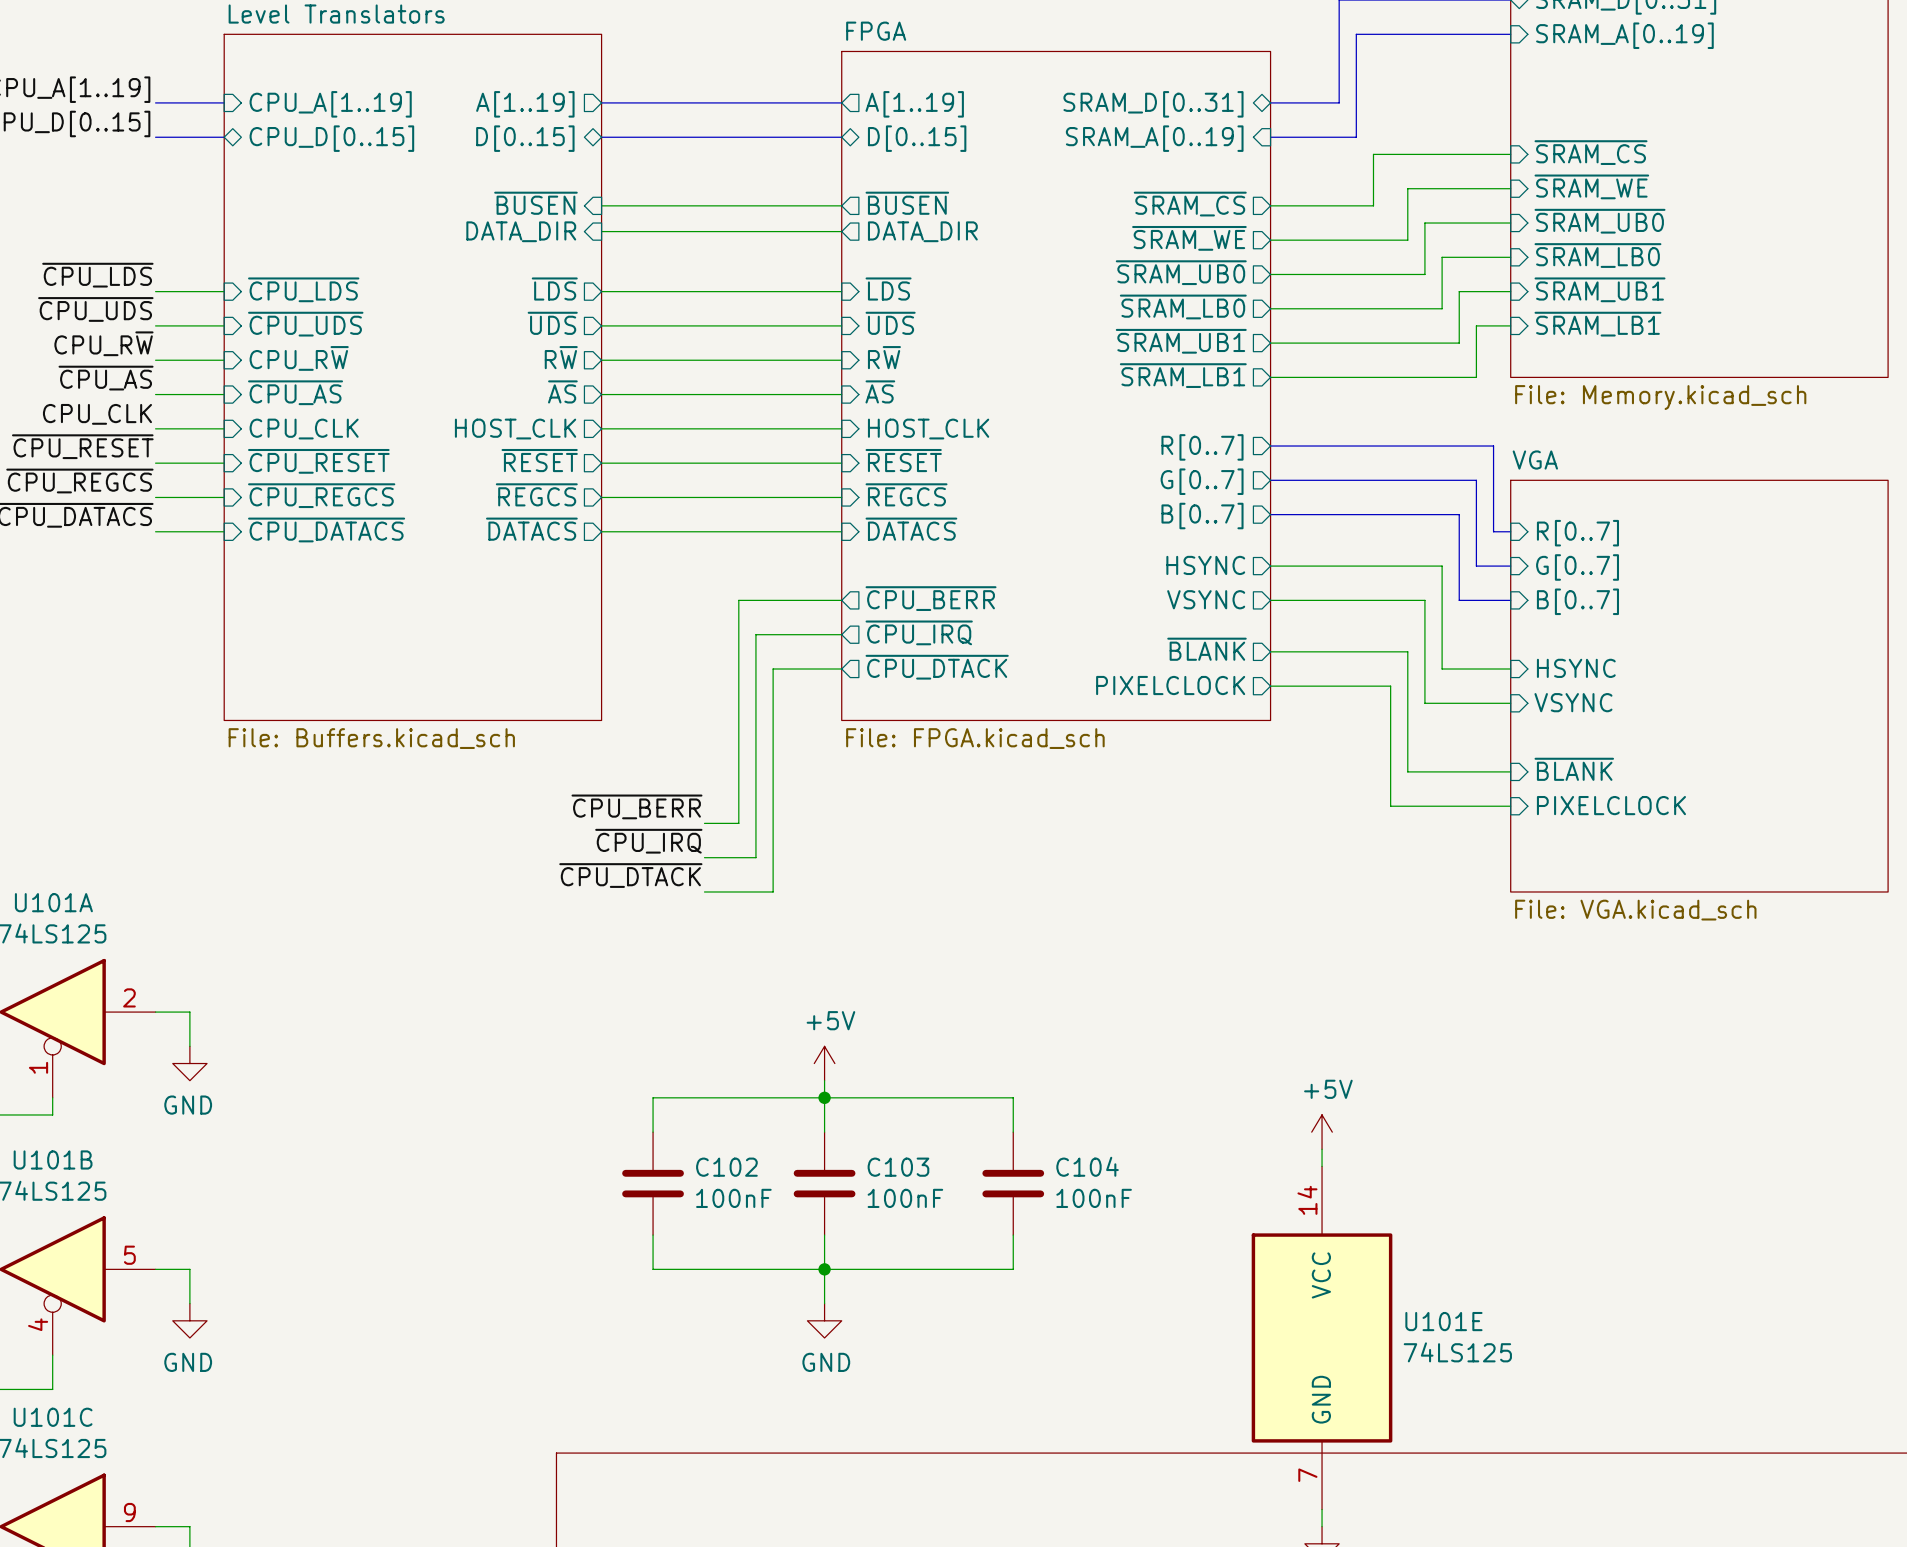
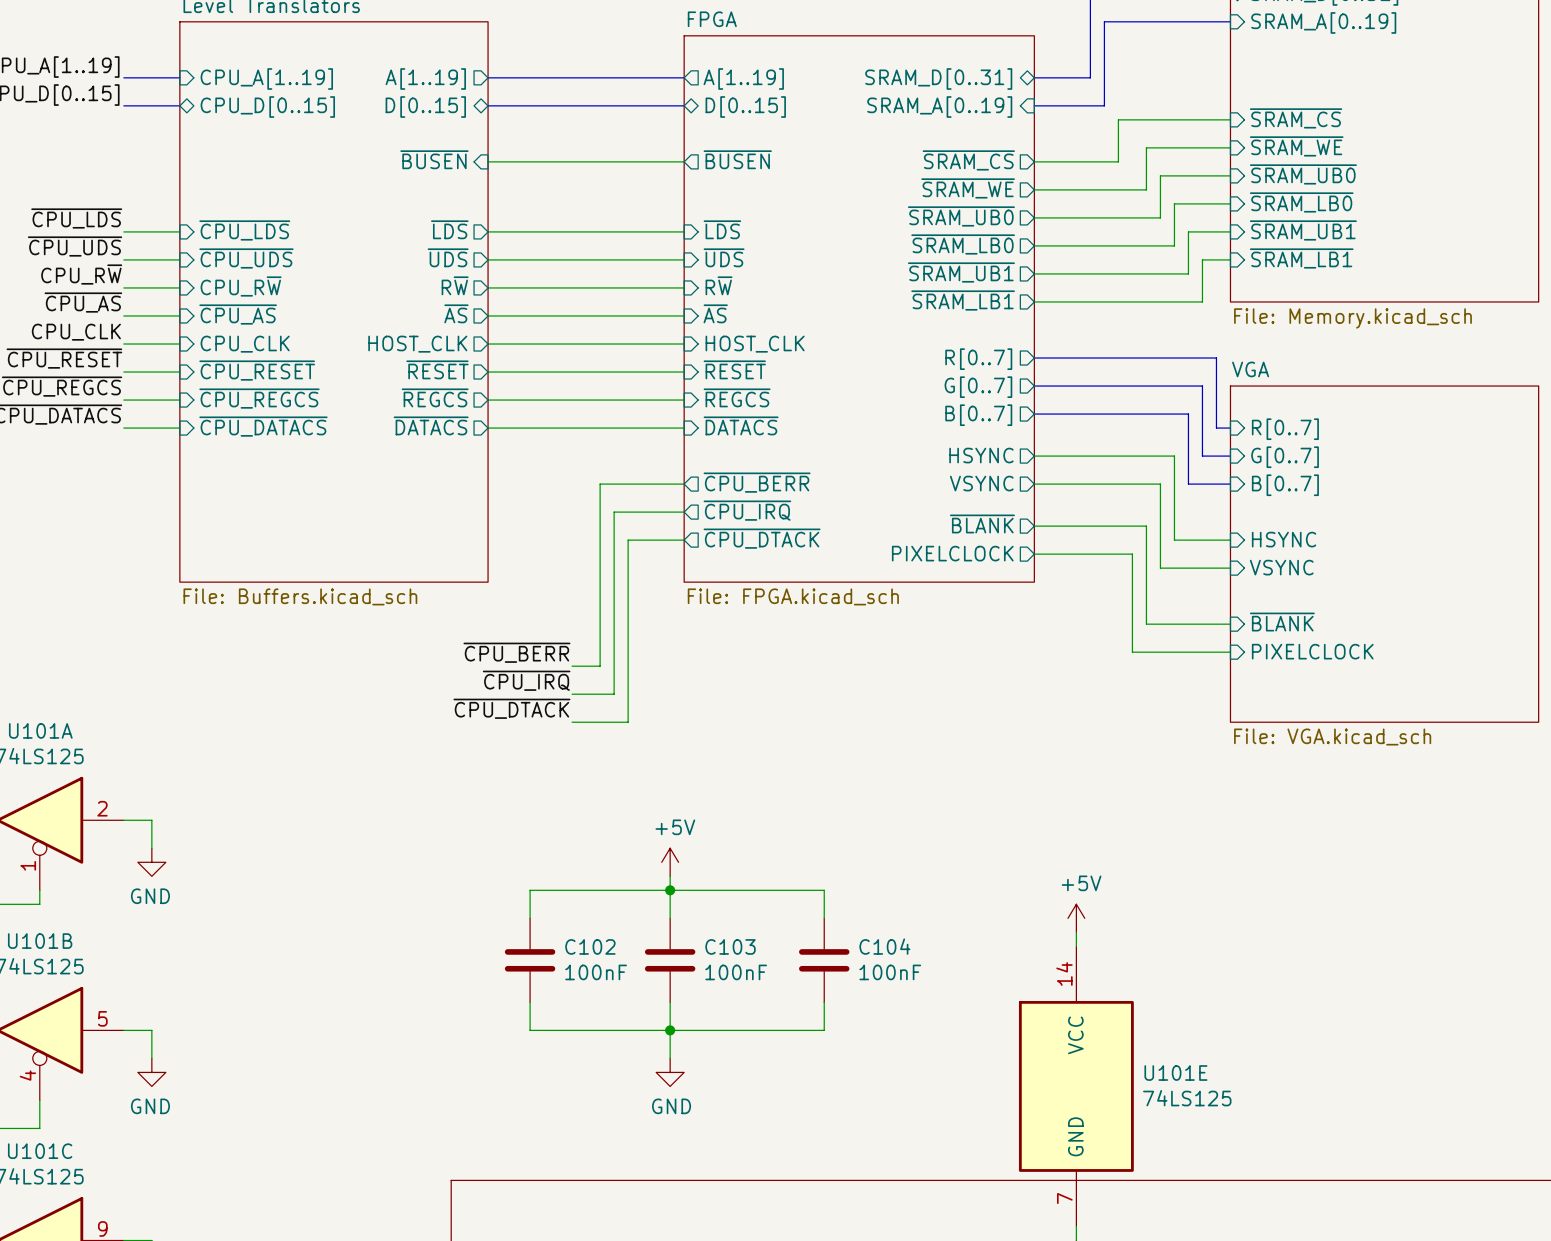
sheet pin: DATA_DIR (521, 231) -> none
wire: (601, 231) (841, 231) -> none
sheet pin: DATA_DIR (922, 231) -> none

